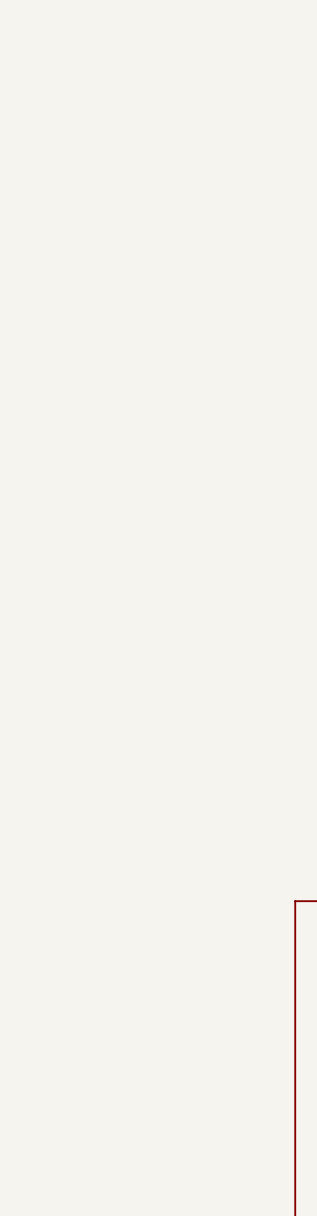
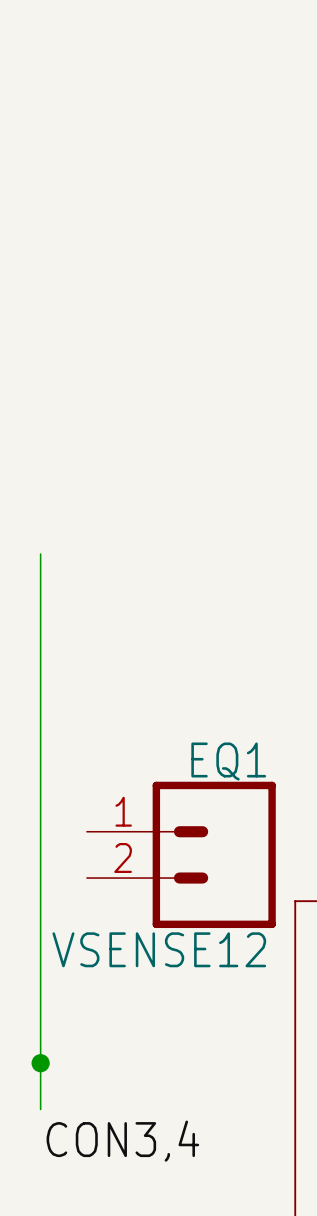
wire: none -> (40, 554) (40, 1109)
VSENSE12: none -> EQ1 (181, 854)
junction: none -> (40, 1063)
label: none -> CON3,4 (122, 1141)

